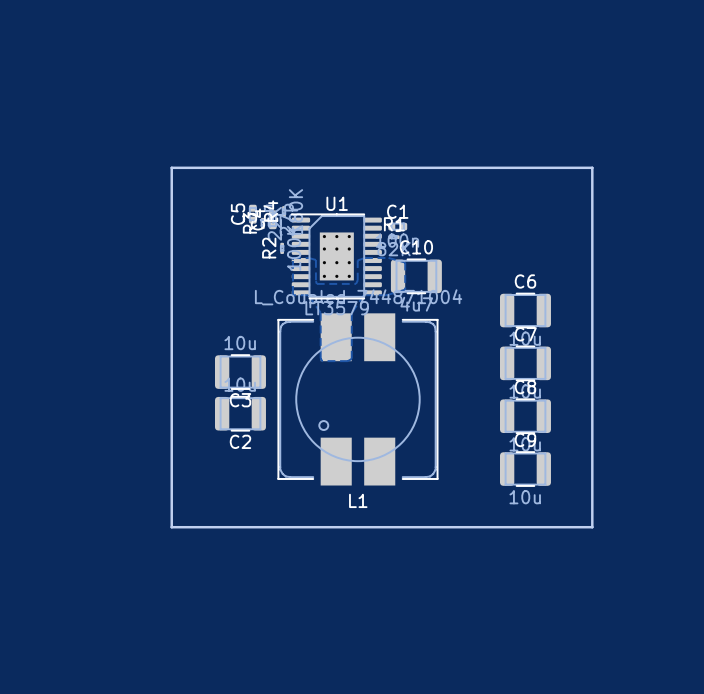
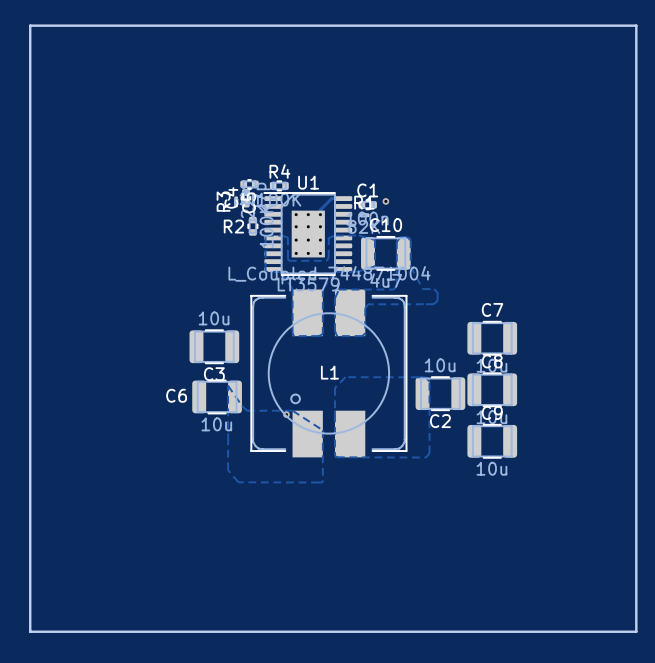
board edge: none -> (30, 25) (636, 25) (636, 631) (30, 631) (30, 25)
board edge: (171, 167) (592, 167) (592, 527) (171, 527) (171, 167) -> none
R4 footprint: [282, 206, 286, 218] -> [269, 180, 289, 192]
C5 rotation: 0° (252, 214) -> 90° clockwise (249, 184)
C5 position: (252, 214) -> (249, 184)
track: none -> (343, 198) (331, 198) (320, 209) (320, 214)
via: none -> (385, 201)
R2 footprint: [280, 242, 285, 254] -> [247, 216, 259, 236]
zone outline: none -> (400, 237) (396, 241) (396, 286) (393, 289) (338, 289) (334, 298) (334, 331) (337, 336) (362, 336) (365, 333) (365, 308) (367, 304) (433, 304) (437, 300) (437, 292) (434, 289) (422, 289) (410, 266) (410, 240) (407, 237) (400, 237)
C6 name position: C6 (525, 281) -> C6 (176, 395)
C6 position: (525, 310) -> (217, 396)
zone outline: none -> (345, 377) (425, 377) (429, 381) (429, 453) (426, 457) (334, 455) (334, 387) (345, 377)
zone outline: none -> (228, 385) (228, 470) (238, 482) (322, 482) (322, 430) (292, 410) (246, 410) (228, 385)
C2 position: (240, 413) -> (440, 393)
via: none -> (286, 414)
L1 name position: L1 (358, 500) -> L1 (329, 372)

